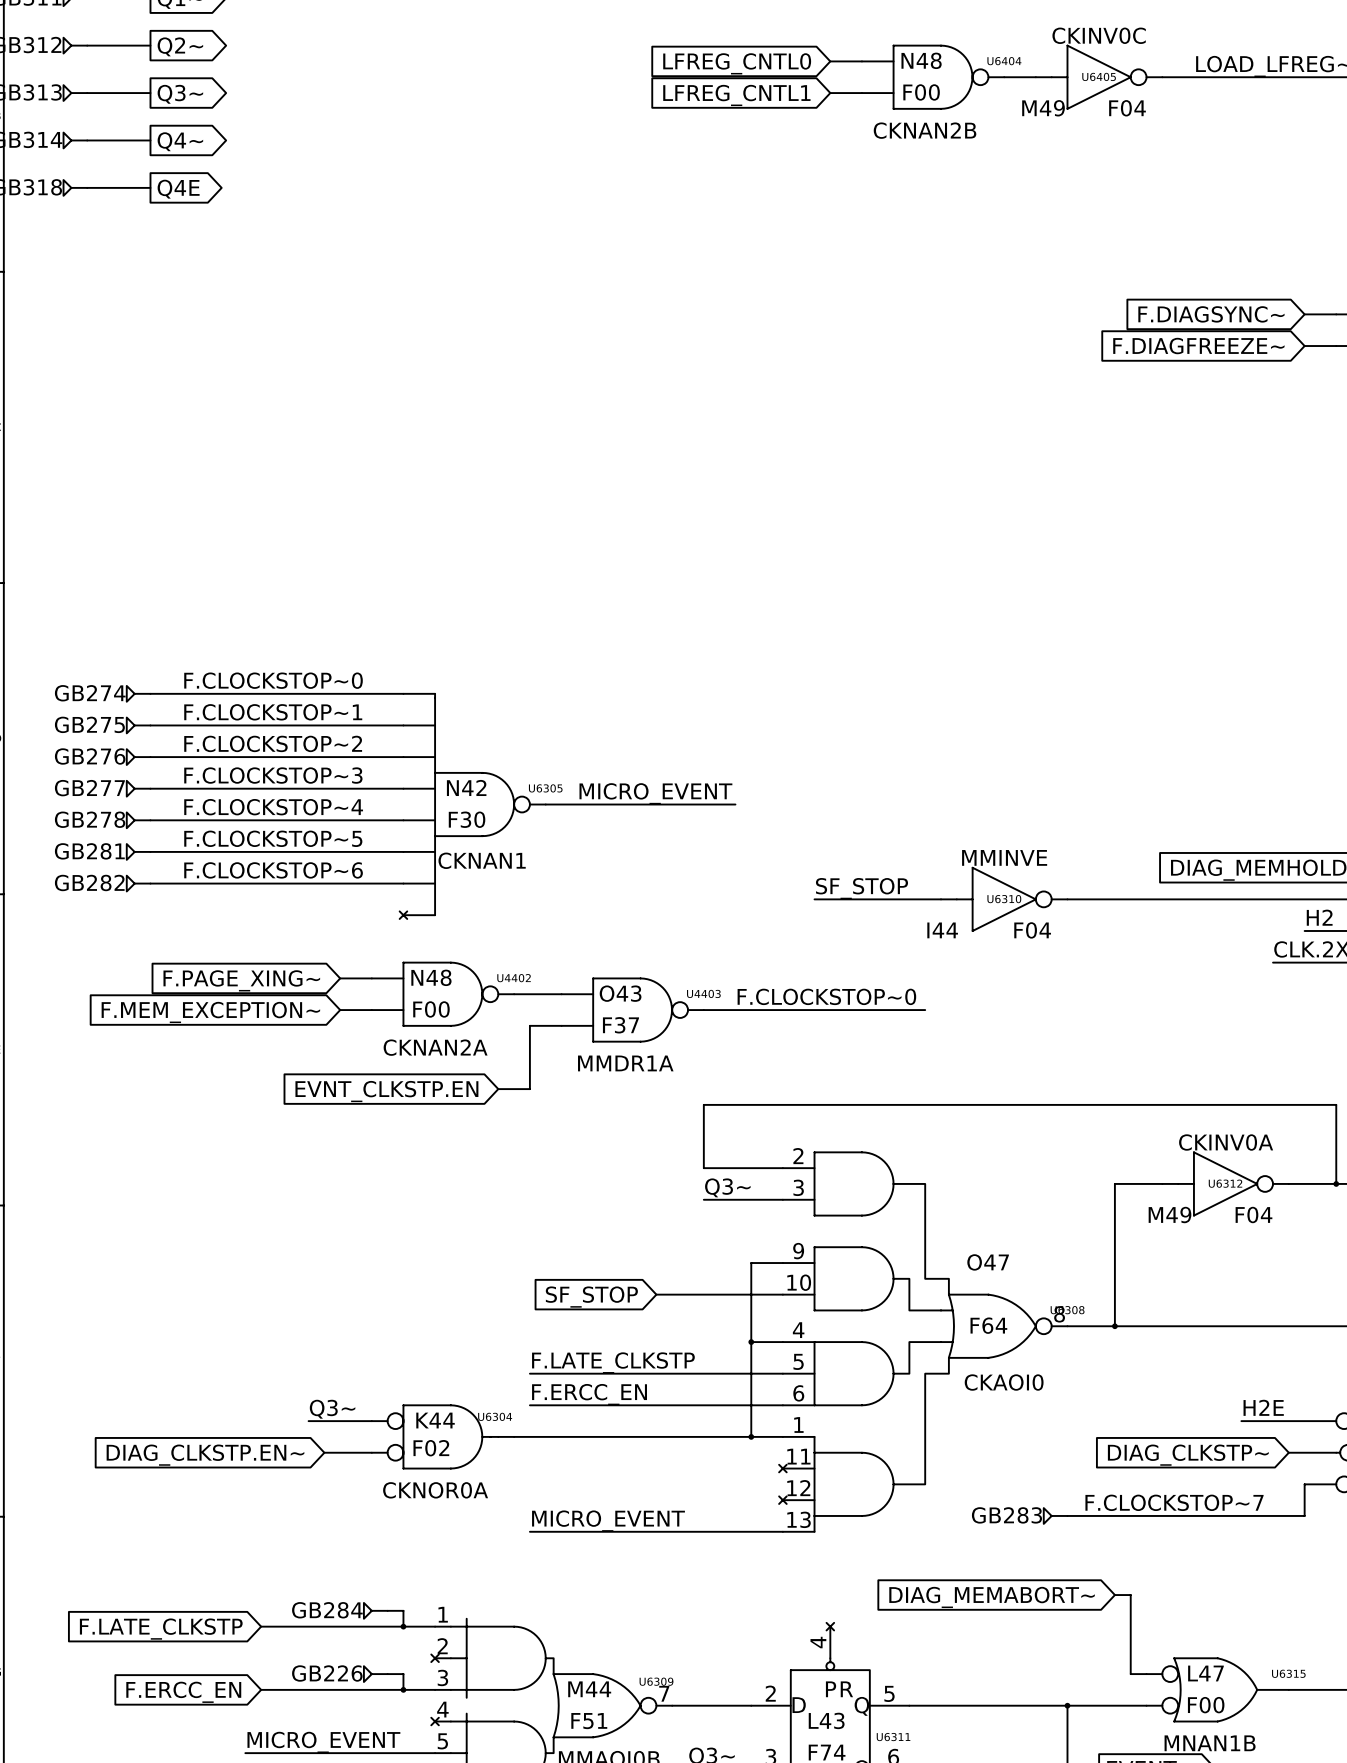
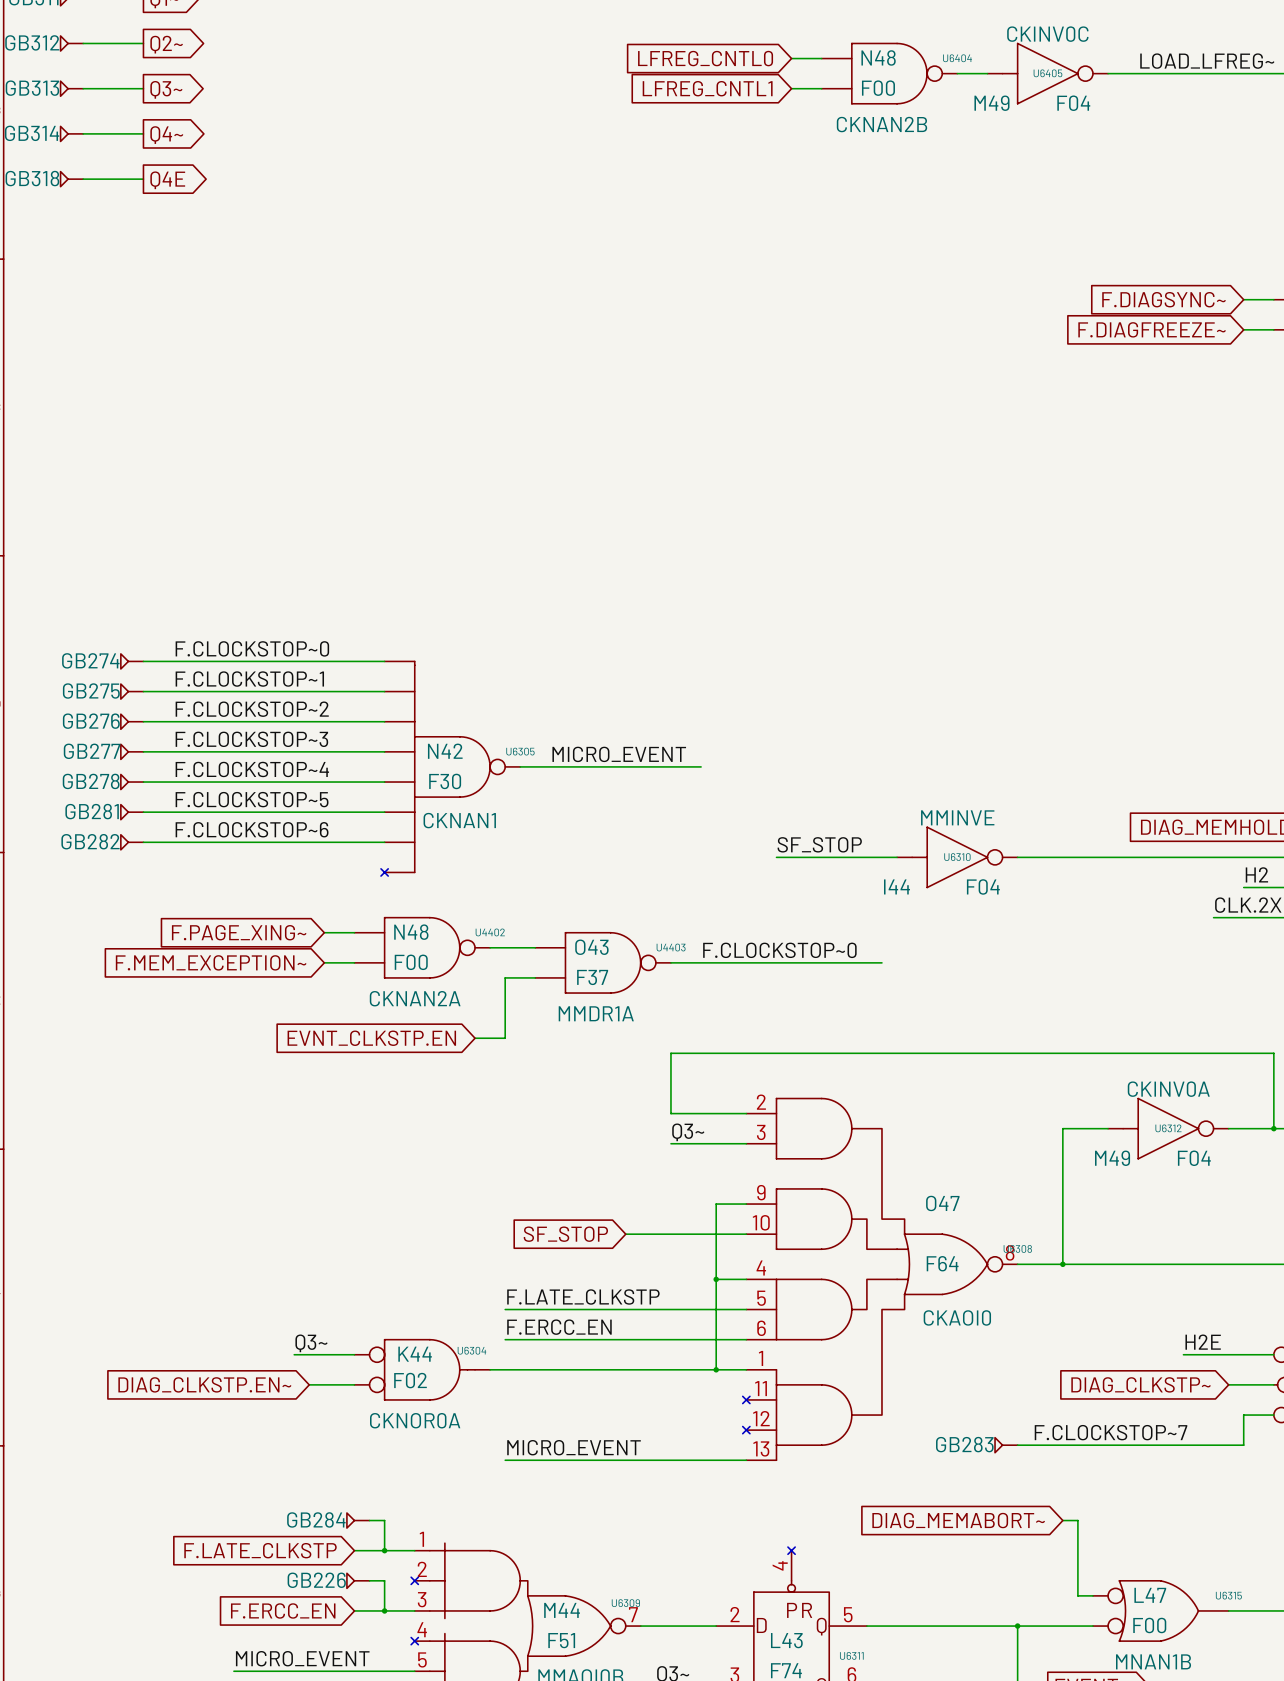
GB284 position: (375, 1610) -> (358, 1520)
wire: (387, 1610) (403, 1610) -> (369, 1520) (384, 1520) (384, 1535)
wire: (261, 1626) (371, 1626) -> none
global label position: F.LATE_CLKSTP (161, 1629) -> F.LATE_CLKSTP (260, 1550)
GB226 position: (375, 1674) -> (358, 1580)
wire: (387, 1674) (403, 1674) -> (369, 1580) (384, 1580) (384, 1595)
wire: (261, 1689) (371, 1689) -> none
global label position: F.ERCC_EN (183, 1692) -> F.ERCC_EN (283, 1610)

